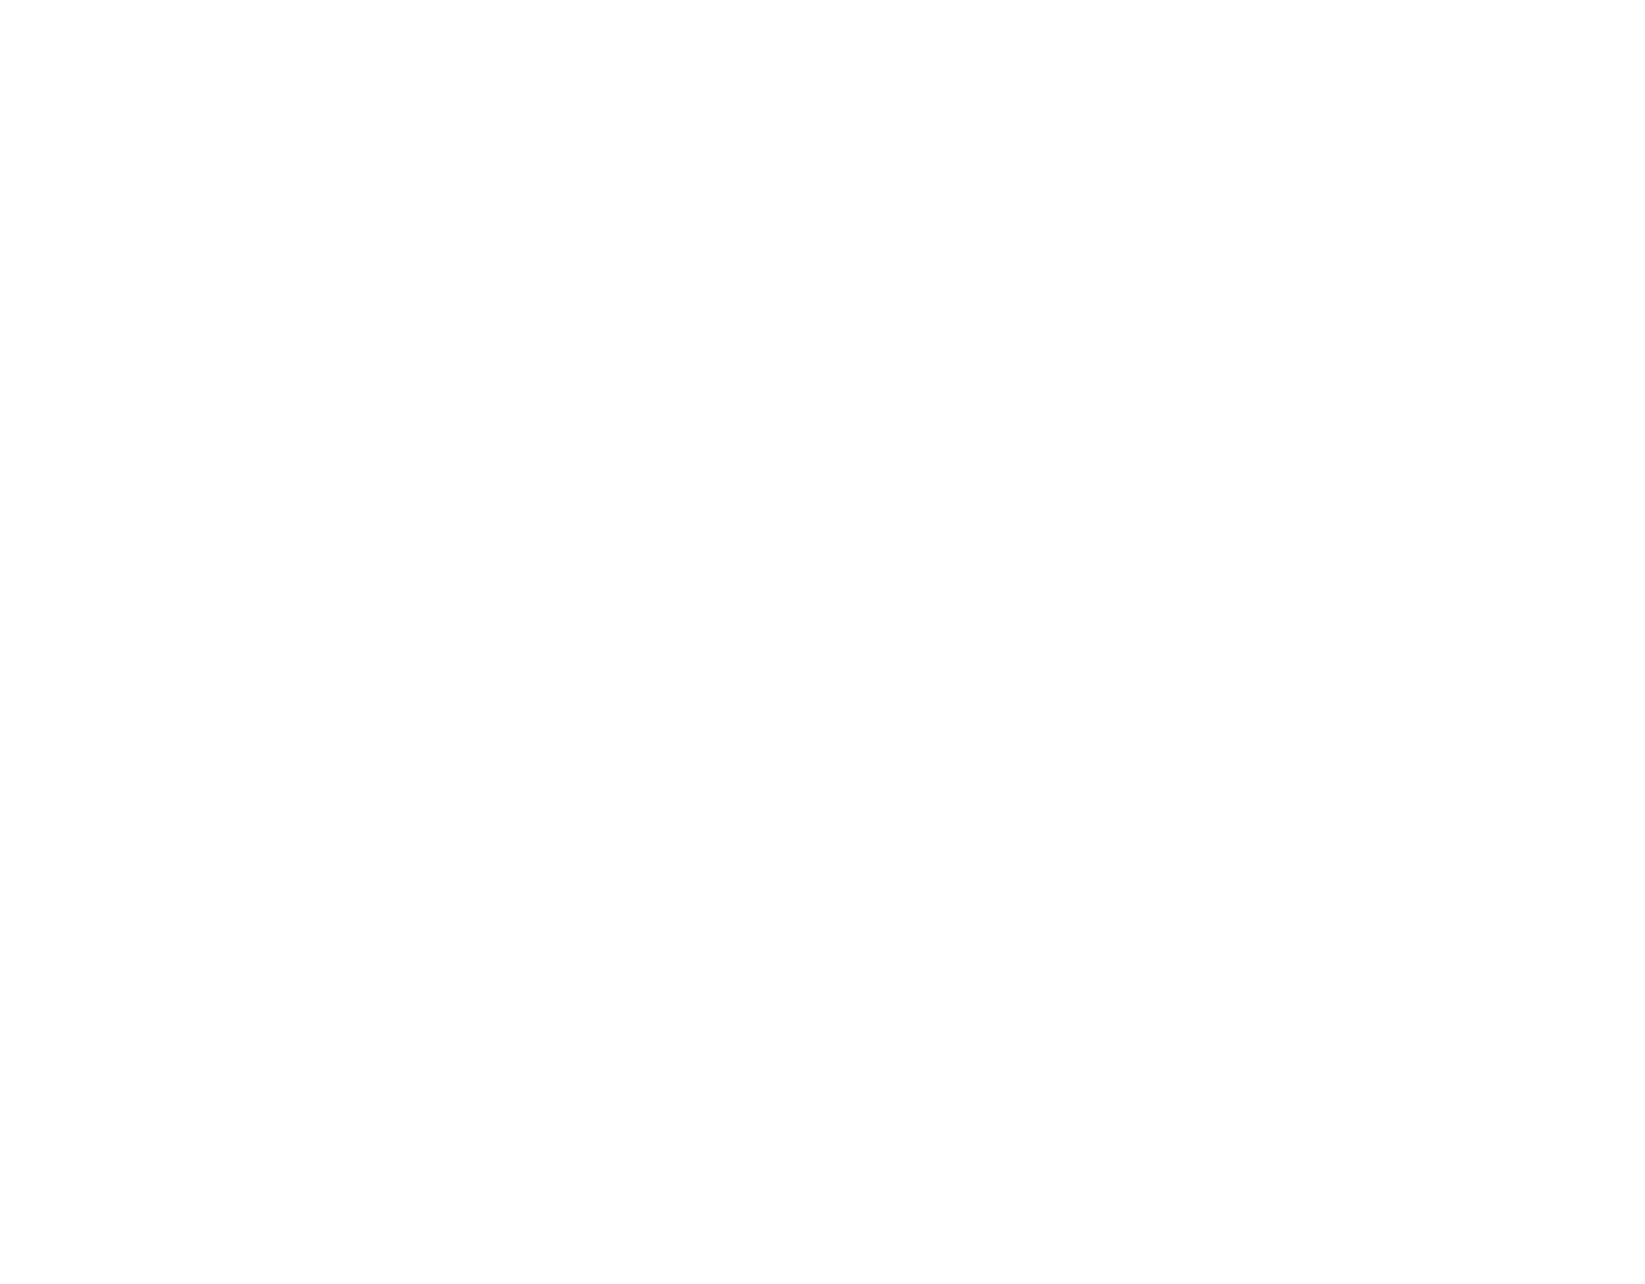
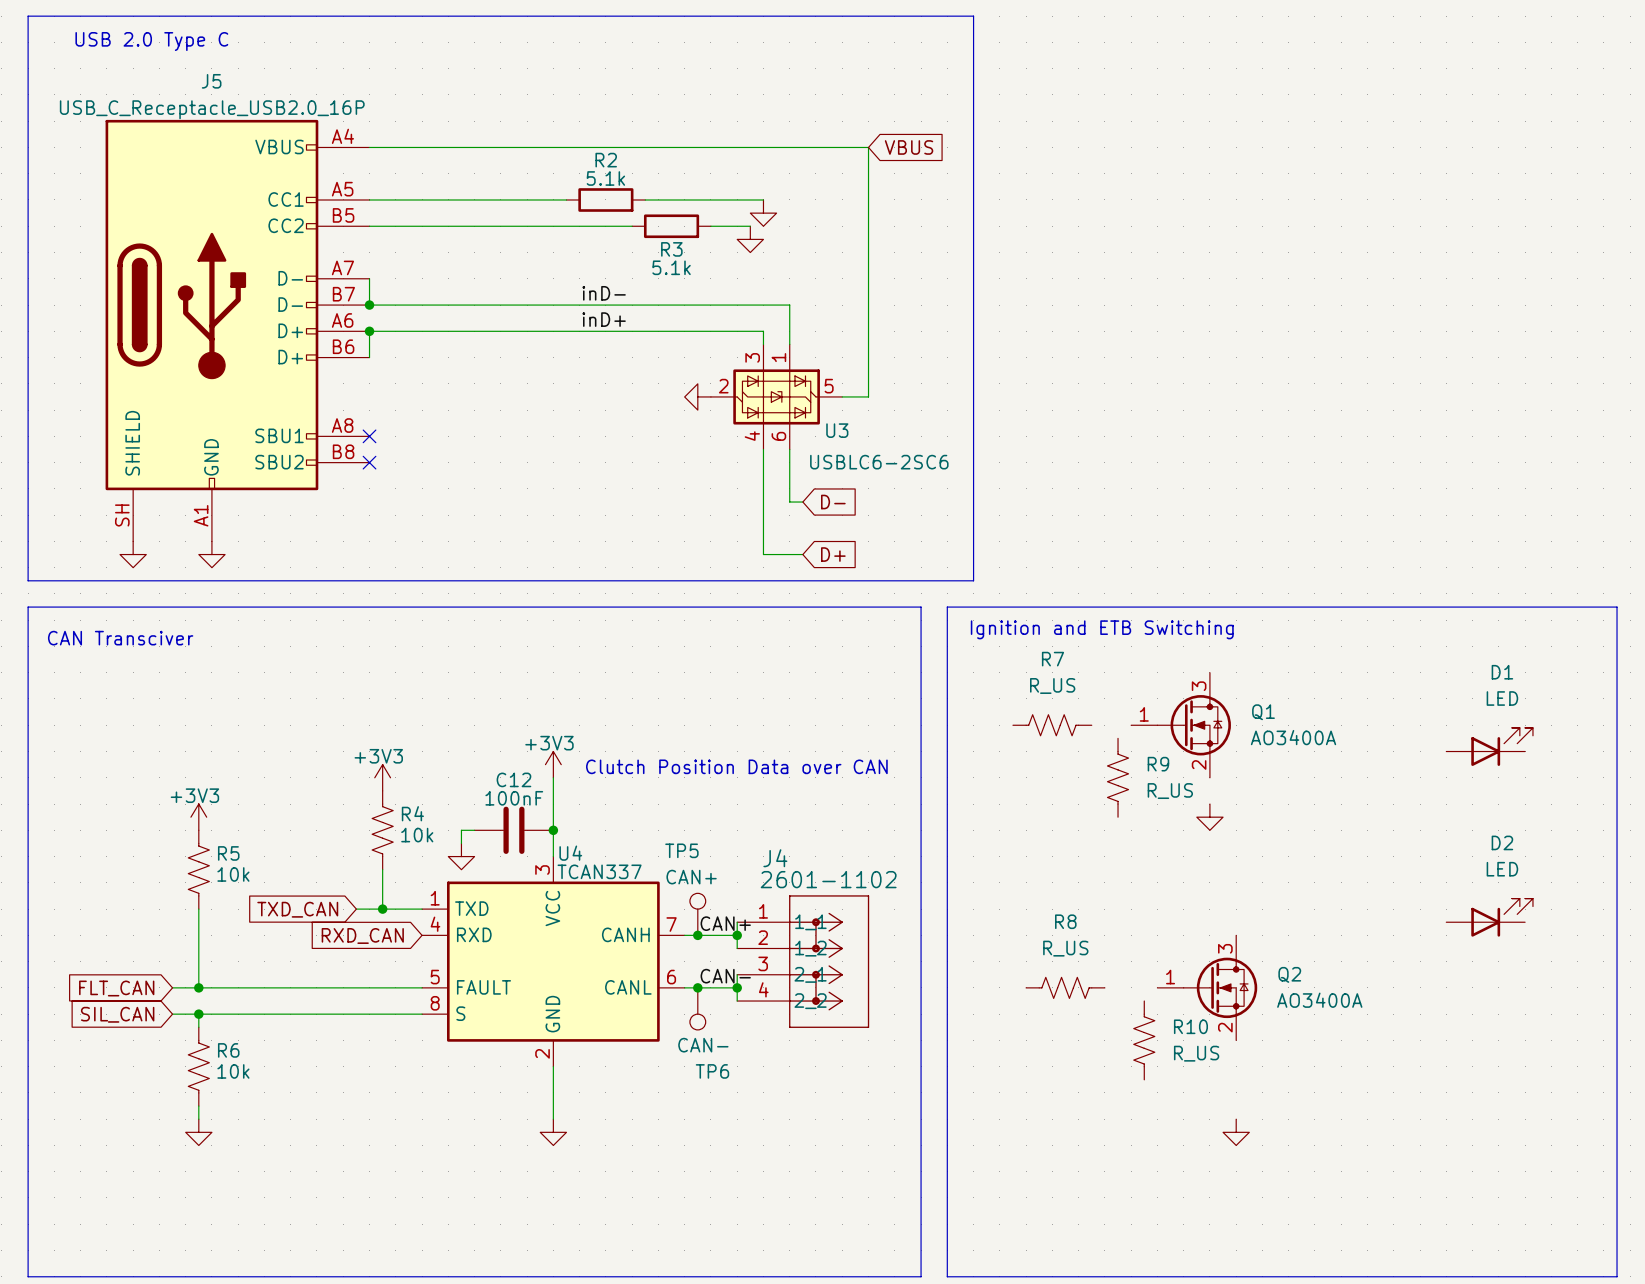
line: none -> (28, 16) (28, 580) (973, 580) (973, 16) (28, 16)
text: none -> USB 2.0 Type C (151, 41)
wire: none -> (369, 147) (868, 147) (868, 396) (842, 396)
global label: none -> VBUS (909, 147)
wire: none -> (369, 199) (566, 199)
R2: none -> 5.1k (605, 199)
wire: none -> (645, 199) (763, 199)
power symbol: none -> (763, 213)
wire: none -> (369, 226) (632, 226)
R3: none -> 5.1k (671, 226)
wire: none -> (710, 226) (750, 226)
power symbol: none -> (750, 239)
wire: none -> (369, 278) (369, 305) (789, 305) (789, 344)
label: none -> inD- (604, 293)
junction: none -> (369, 305)
label: none -> inD+ (604, 319)
J5: none -> USB_C_Receptacle_USB2.0_16P (237, 330)
junction: none -> (369, 331)
wire: none -> (763, 344) (763, 331) (369, 331) (369, 357)
power symbol: none -> (697, 396)
U3: none -> USBLC6-2SC6 (776, 396)
no-connect mark: none -> (369, 436)
wire: none -> (763, 449) (763, 554) (802, 554)
wire: none -> (789, 449) (789, 502) (802, 502)
no-connect mark: none -> (369, 462)
global label: none -> D- (833, 502)
power symbol: none -> (133, 554)
power symbol: none -> (211, 554)
global label: none -> D+ (833, 554)
line: none -> (28, 607) (921, 607) (921, 1276) (28, 1276) (28, 607)
line: none -> (947, 607) (1617, 607) (1617, 1276) (947, 1276) (947, 607)
text: none -> Ignition and ETB Switching (1102, 629)
text: none -> CAN Transciver (120, 638)
R7: none -> R_US (1052, 725)
Q1: none -> AO3400A (1181, 725)
D1: none -> LED (1489, 746)
power symbol: none -> +3V3 (553, 764)
text: none -> Clutch Position Data over CAN (736, 766)
power symbol: none -> +3V3 (382, 777)
wire: none -> (553, 777) (553, 856)
R9: none -> R_US (1118, 777)
power symbol: none -> +3V3 (198, 817)
power symbol: none -> (1209, 817)
R4: none -> 10k (382, 830)
wire: none -> (474, 830) (461, 830) (461, 843)
C12: none -> 100nF (513, 830)
junction: none -> (553, 830)
power symbol: none -> (461, 856)
R5: none -> 10k (198, 869)
wire: none -> (382, 869) (382, 909)
wire: none -> (198, 909) (198, 987)
global label: none -> TXD_CAN (297, 909)
wire: none -> (356, 909) (422, 909)
junction: none -> (382, 909)
TP5: none -> CAN+ (697, 914)
D2: none -> LED (1489, 917)
wire: none -> (737, 922) (737, 948)
label: none -> CAN+ (725, 923)
global label: none -> RXD_CAN (362, 935)
wire: none -> (684, 935) (737, 935)
junction: none -> (697, 935)
junction: none -> (737, 935)
U4: none -> TCAN337 (553, 961)
J4: none -> 2601-1102 (803, 961)
wire: none -> (737, 974) (737, 1001)
label: none -> CAN- (725, 976)
wire: none -> (172, 987) (422, 987)
junction: none -> (198, 987)
wire: none -> (684, 987) (737, 987)
junction: none -> (697, 987)
junction: none -> (737, 987)
R8: none -> R_US (1065, 987)
Q2: none -> AO3400A (1207, 987)
global label: none -> FLT_CAN (116, 988)
TP6: none -> CAN- (697, 1008)
global label: none -> SIL_CAN (117, 1014)
wire: none -> (172, 1014) (422, 1014)
wire: none -> (198, 1014) (198, 1027)
junction: none -> (198, 1014)
R10: none -> R_US (1144, 1040)
R6: none -> 10k (198, 1066)
wire: none -> (553, 1066) (553, 1119)
wire: none -> (198, 1106) (198, 1119)
power symbol: none -> (198, 1132)
power symbol: none -> (553, 1132)
power symbol: none -> (1236, 1132)

